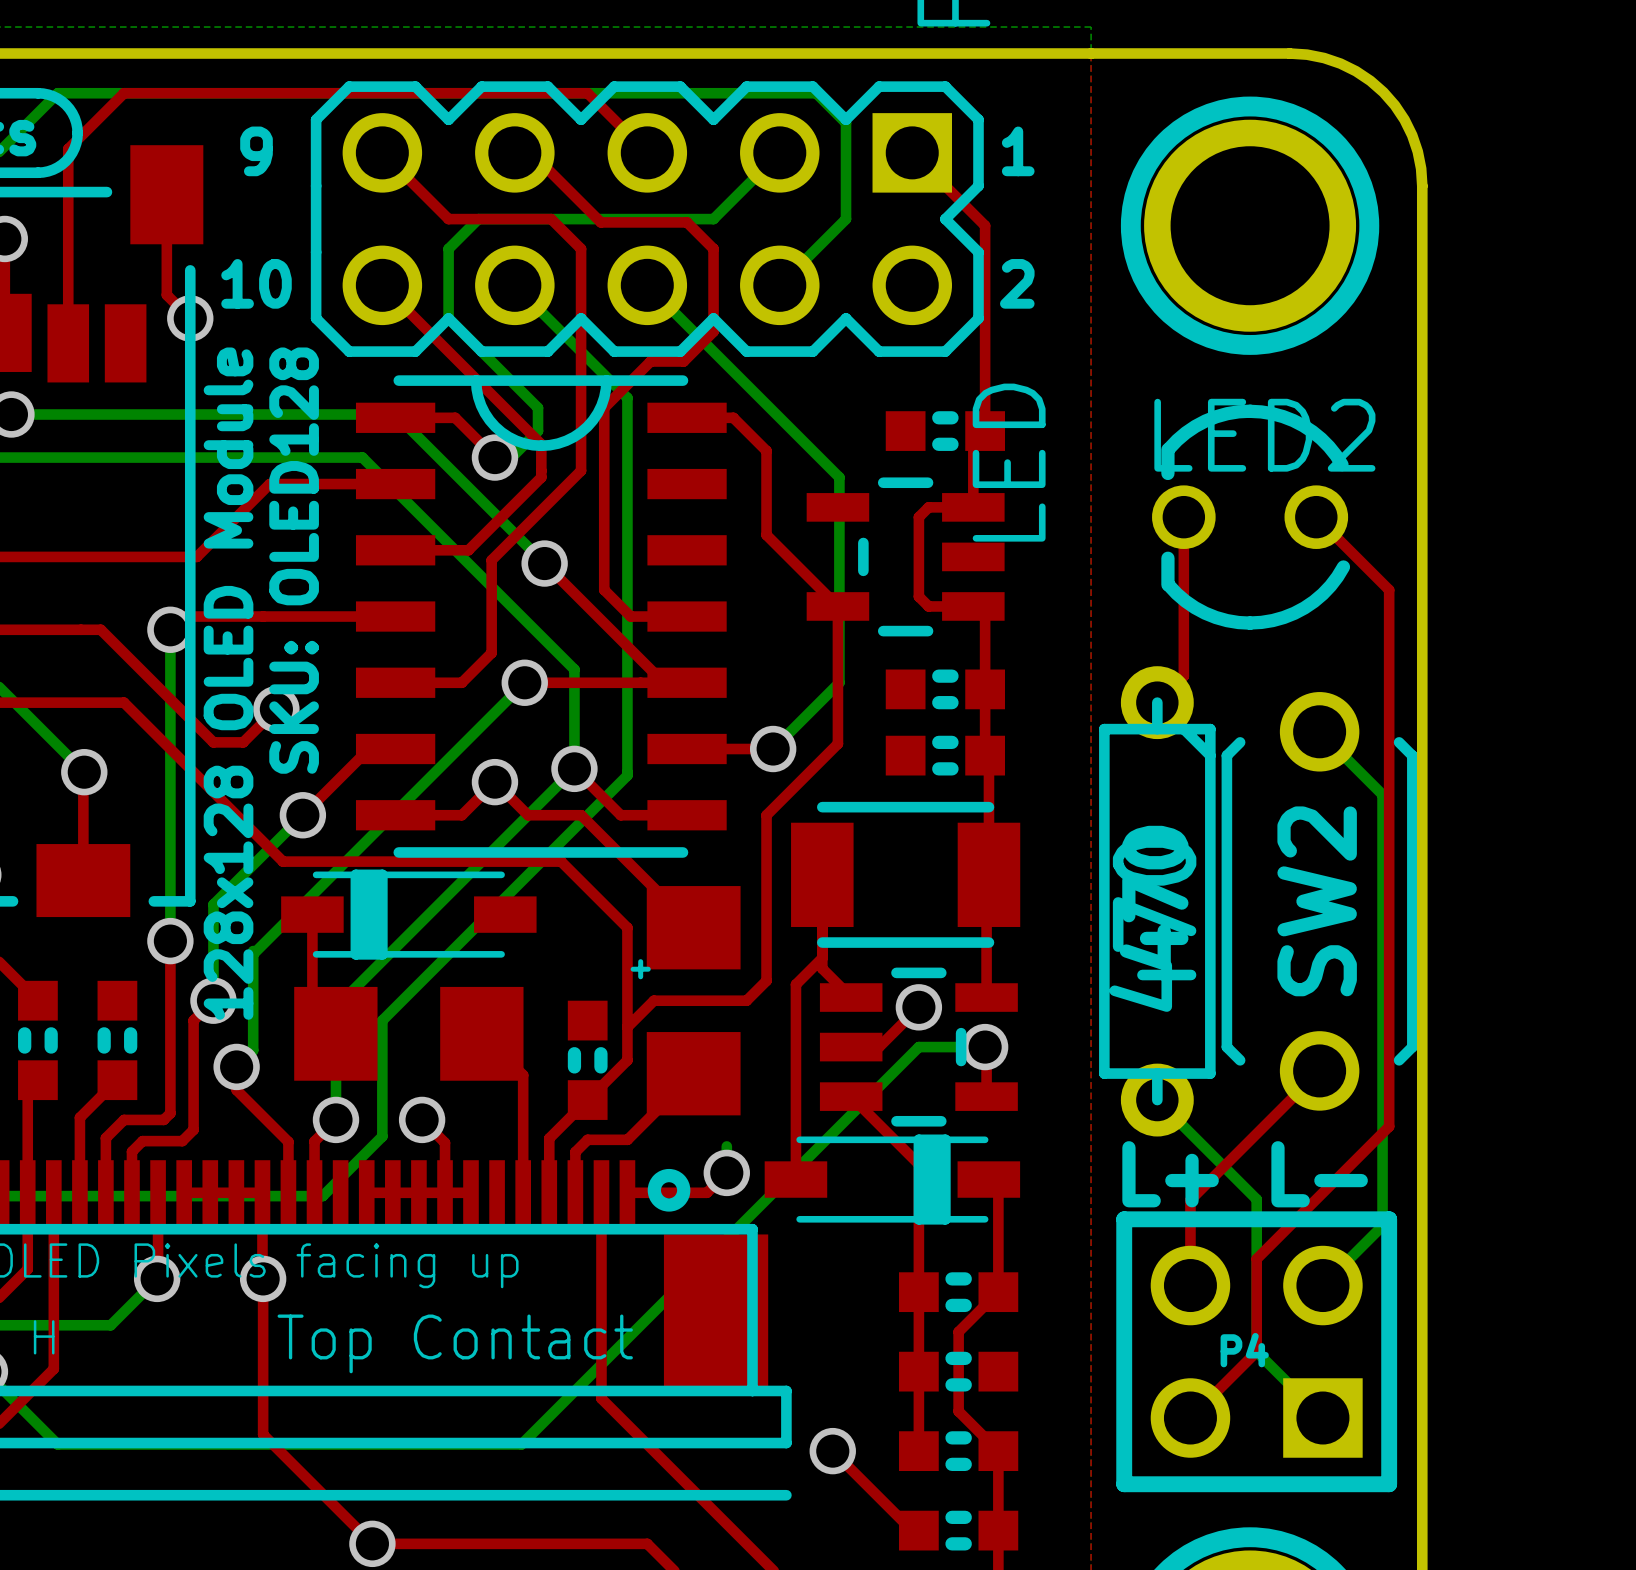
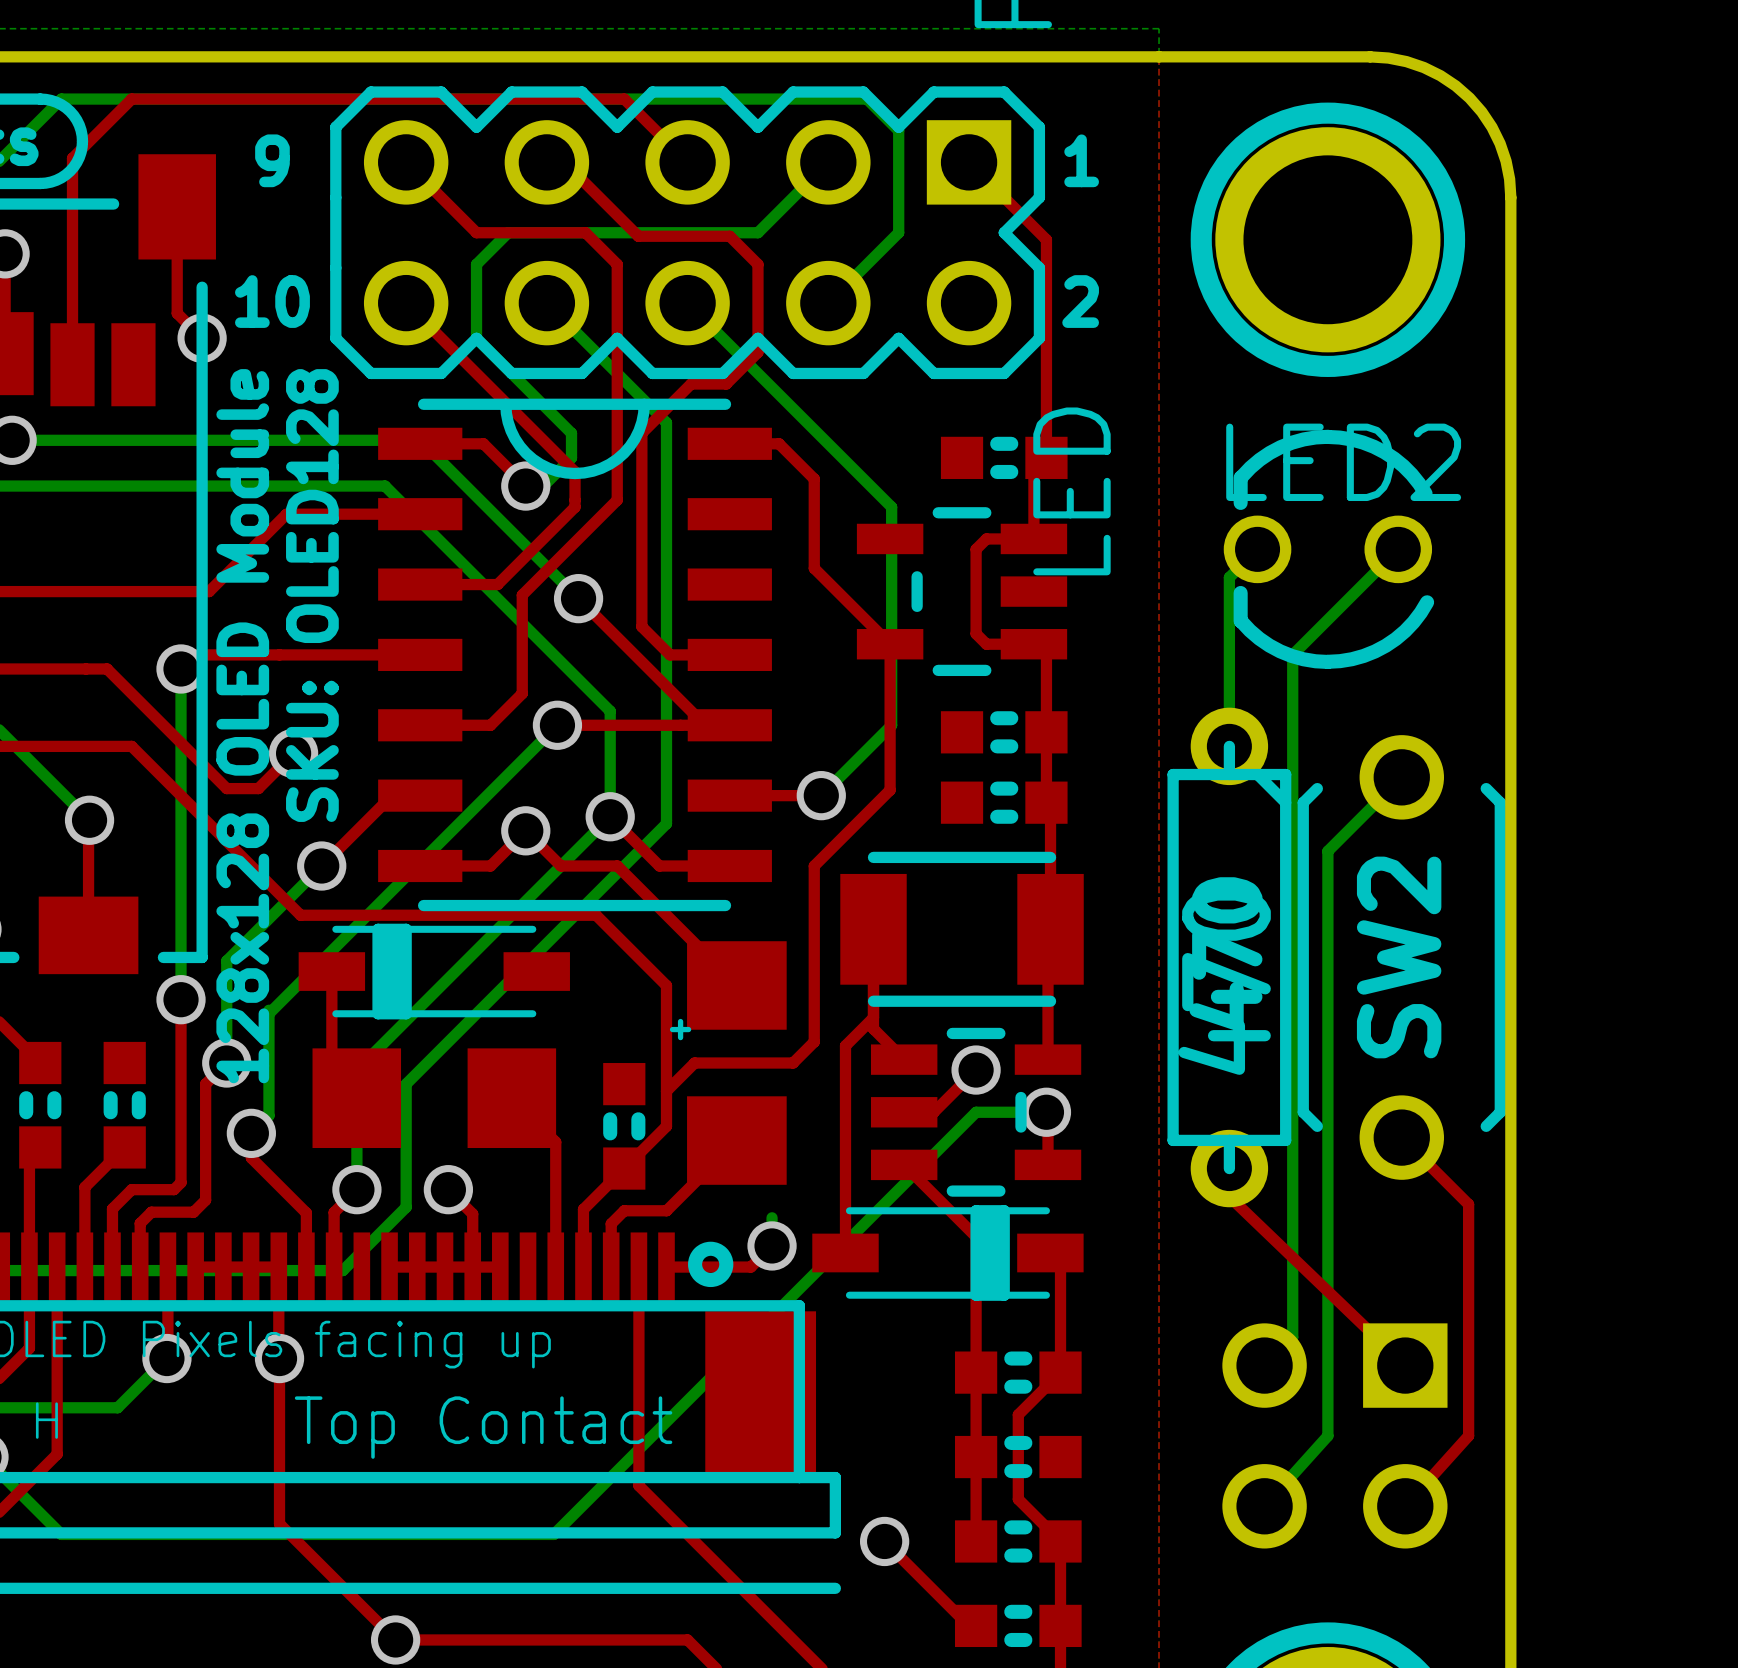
top track: (1183, 517) (1183, 676) (1157, 702) -> none
bottom track: none -> (1257, 549) (1229, 577) (1229, 746)
top track: (1316, 517) (1389, 590) (1389, 1126) (1256, 1259) (1256, 1351) (1190, 1418) -> none
bottom track: none -> (1398, 549) (1292, 654) (1292, 1337) (1264, 1365)
bottom track: (1319, 731) (1382, 794) (1382, 1225) (1322, 1285) -> (1401, 777) (1327, 851) (1327, 1435) (1264, 1506)
top track: (1319, 1070) (1190, 1200) (1190, 1285) -> (1401, 1137) (1468, 1204) (1468, 1435) (1405, 1506)
top track: none -> (1229, 1165) (1229, 1196) (1405, 1365)
bottom track: (1157, 1100) (1256, 1199) (1256, 1351) (1322, 1418) -> none
text: L+ (1170, 1174) -> none
text: L- (1319, 1174) -> none
P4 side: top (1256, 1351) -> bottom (1334, 1435)

